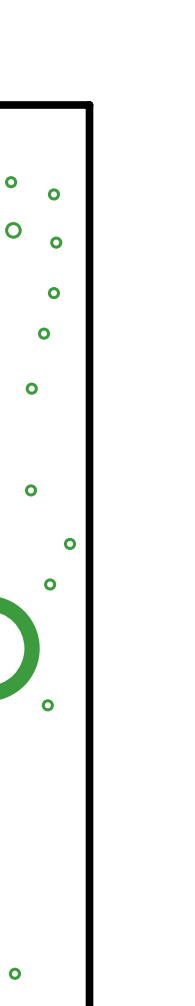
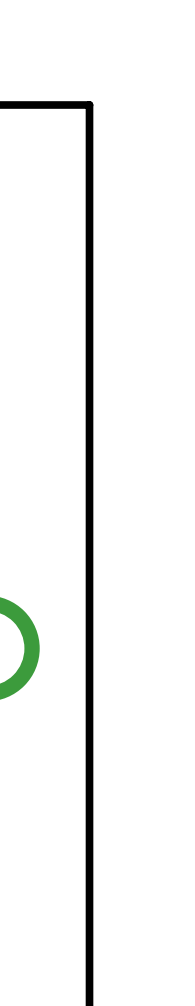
via: (11, 182) -> none
via: (53, 194) -> none
via: (13, 230) -> none
via: (56, 242) -> none
via: (53, 293) -> none
via: (44, 333) -> none
via: (31, 388) -> none
via: (31, 490) -> none
via: (70, 543) -> none
via: (50, 584) -> none
via: (47, 705) -> none
via: (14, 973) -> none

